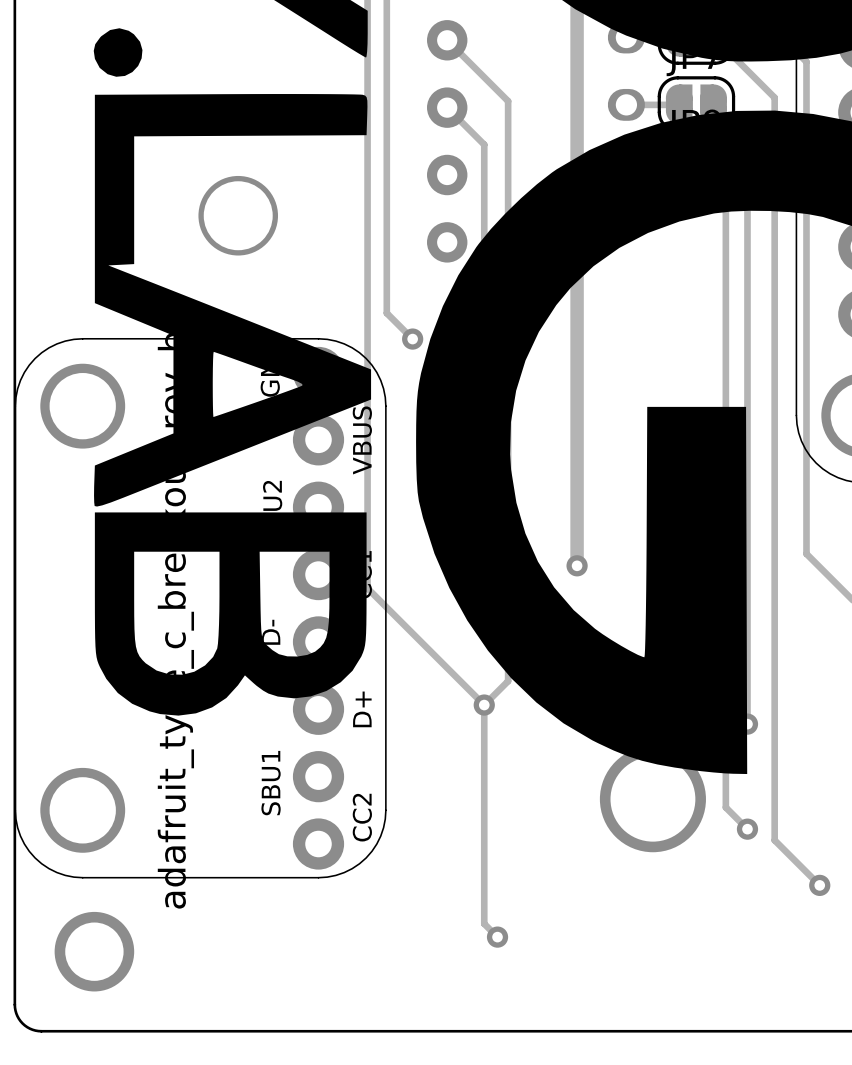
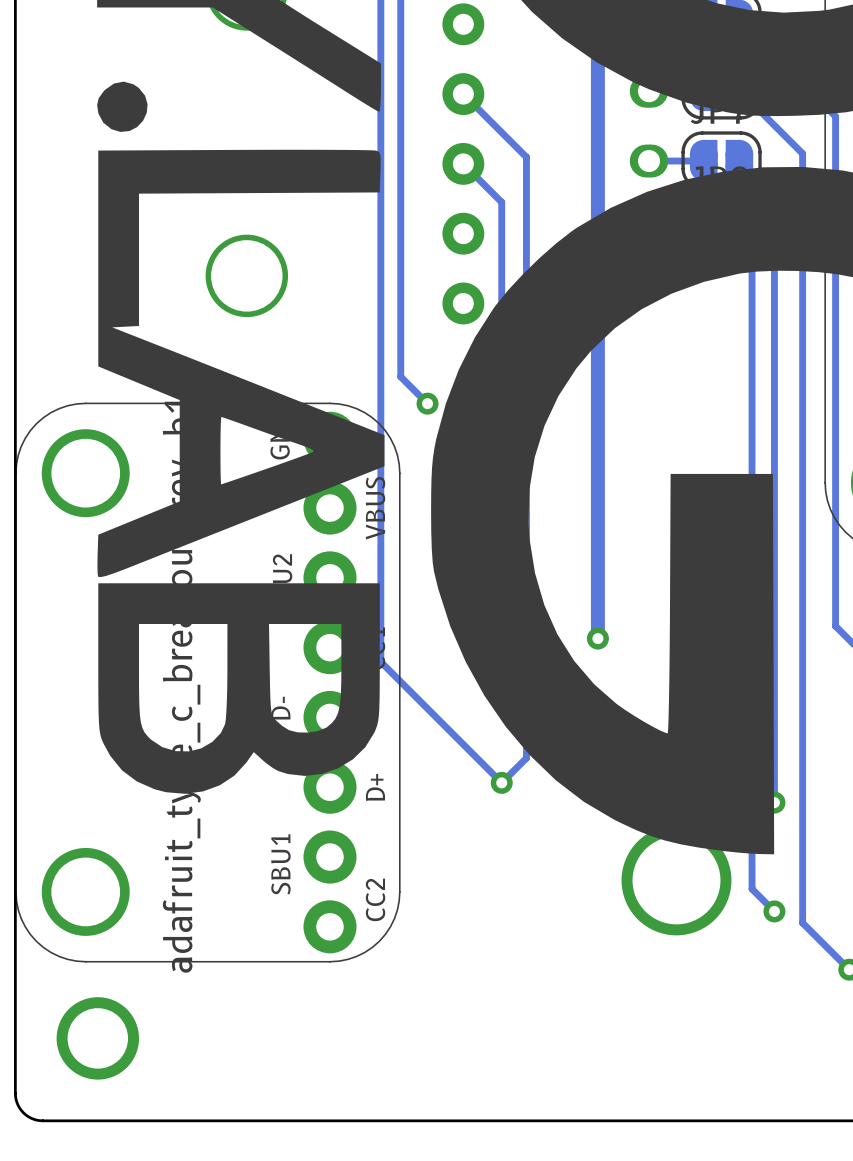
track: (484, 705) (484, 923) (497, 937) -> none
via: (497, 937) -> none

